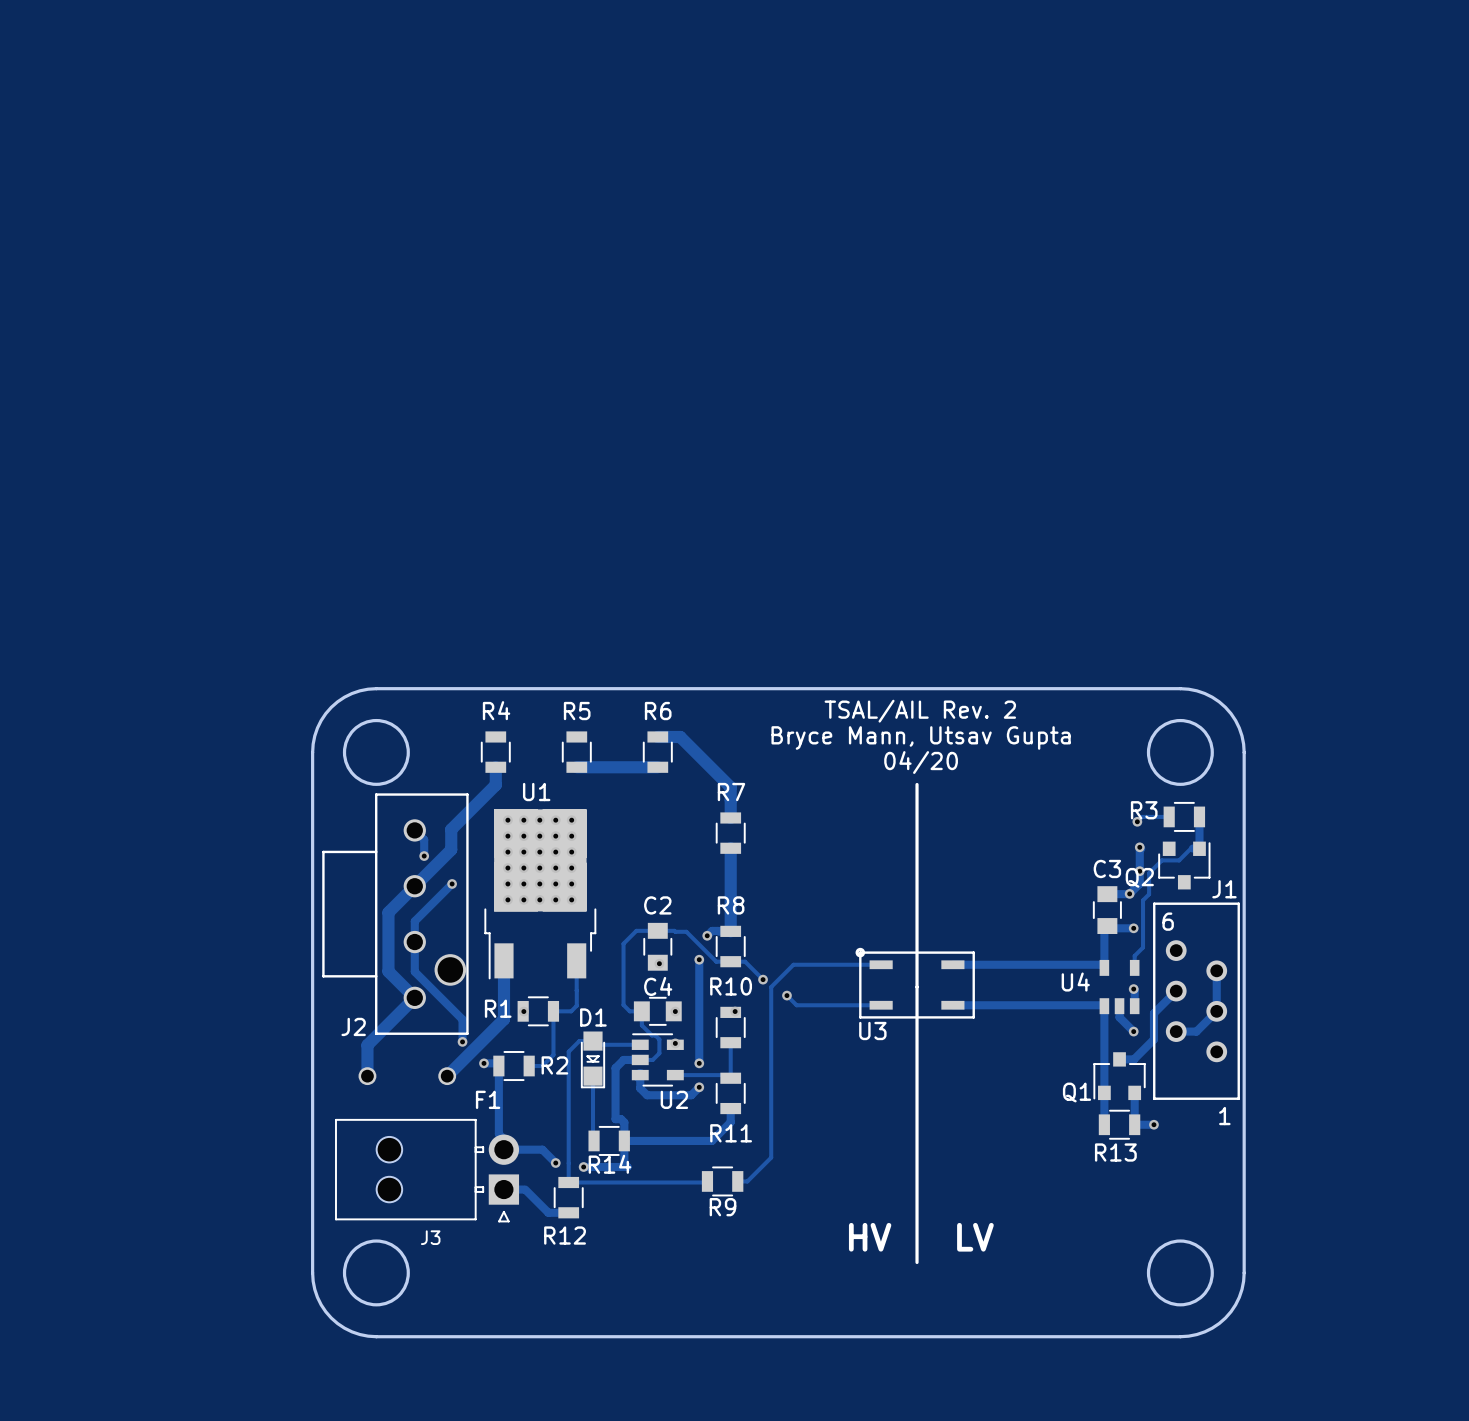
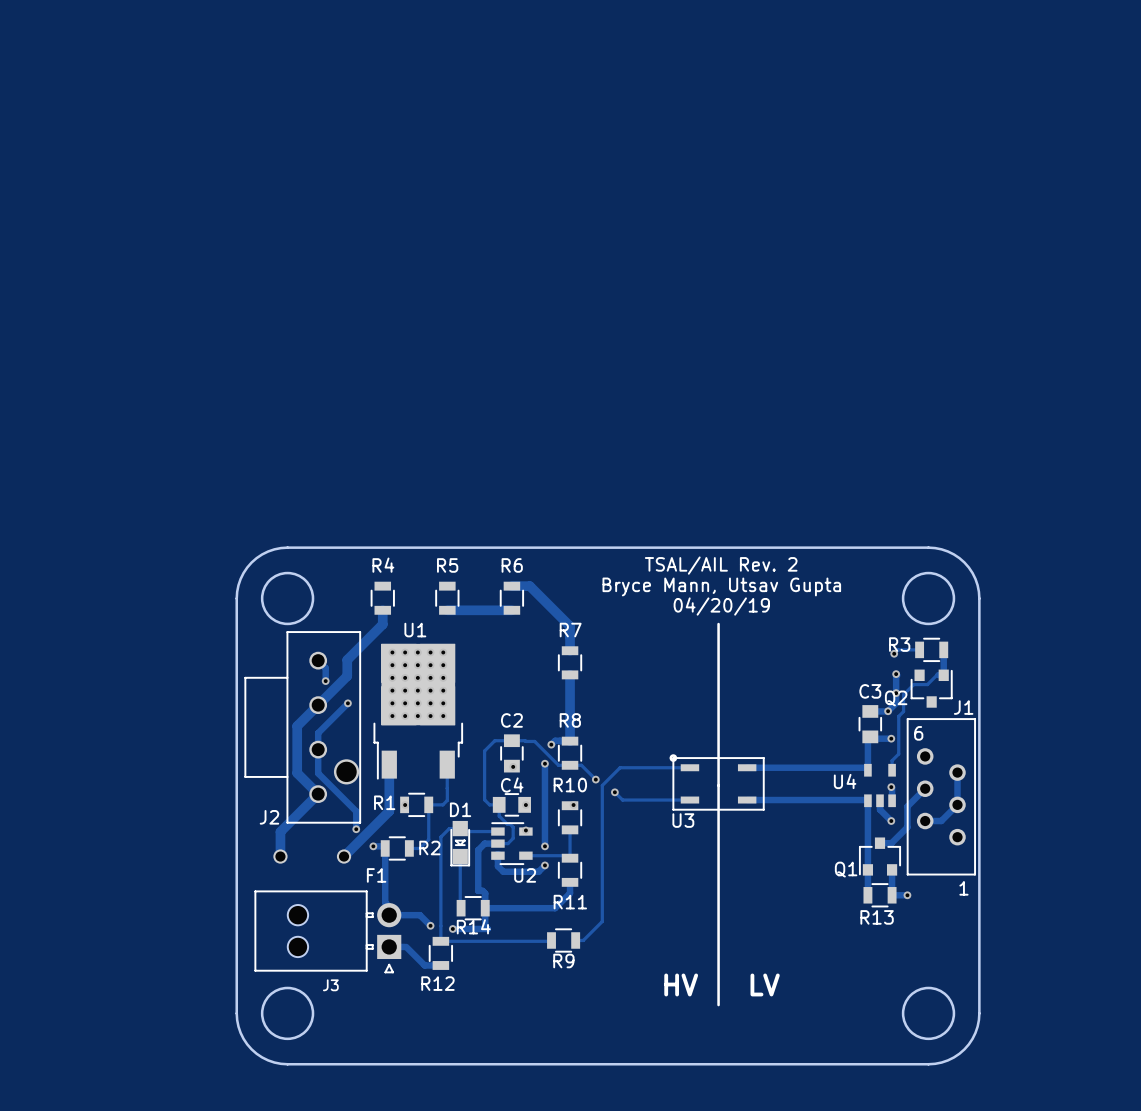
text: 04/20 (921, 762) -> 04/20/19 (721, 606)

